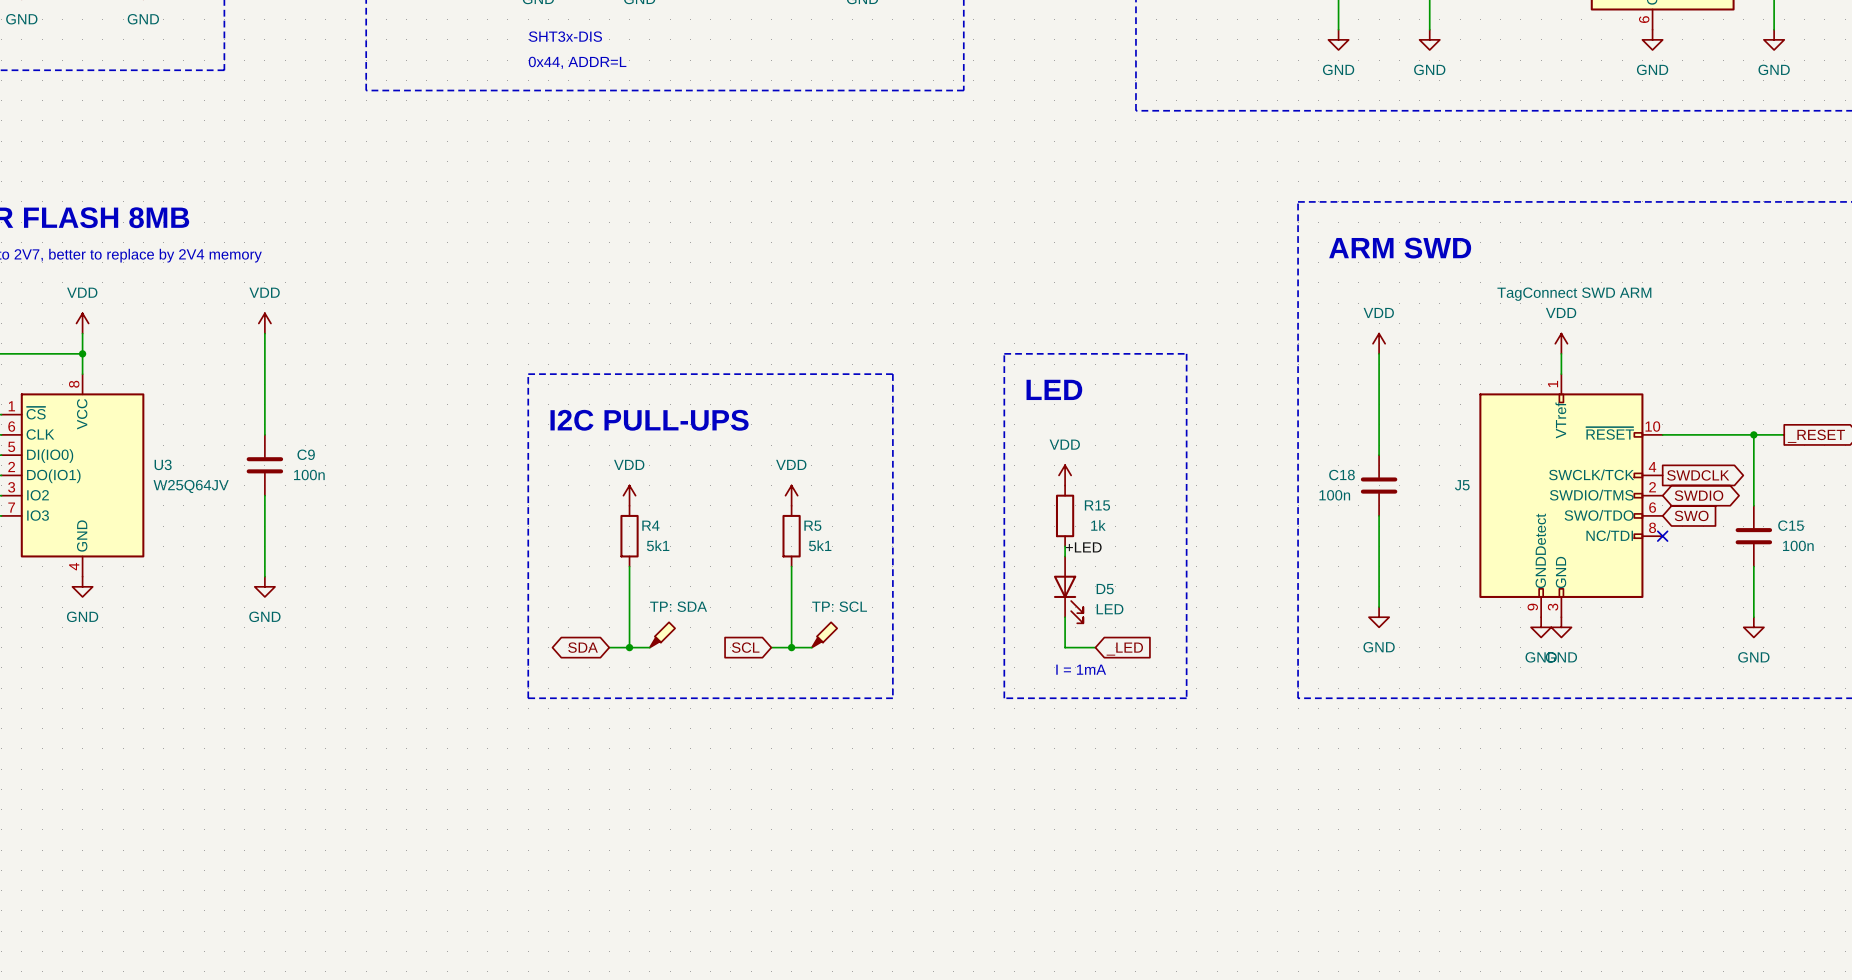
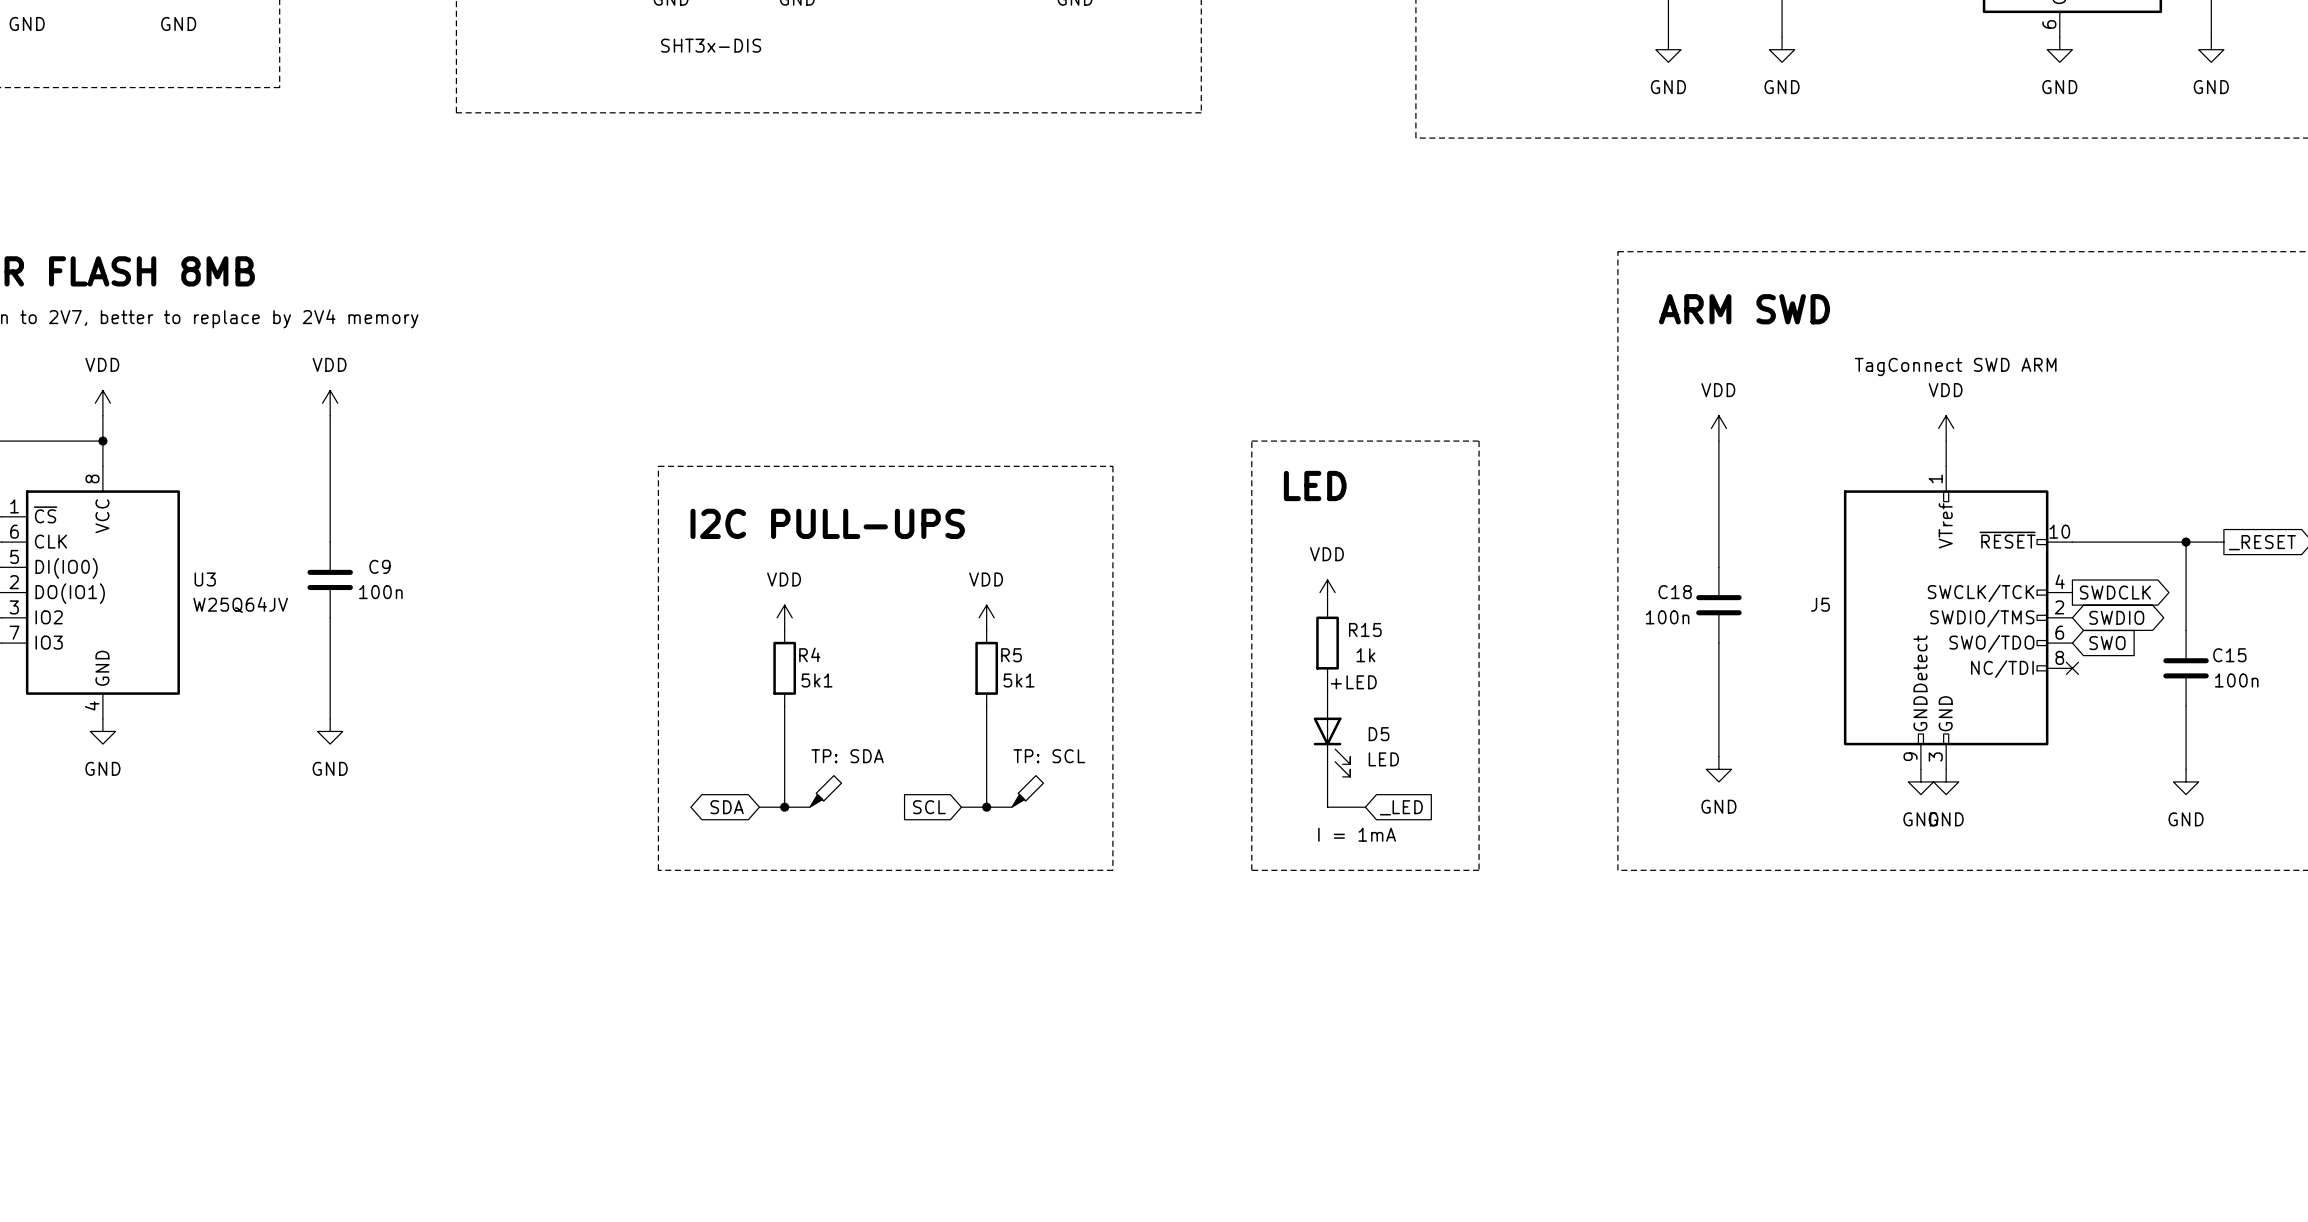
text: 0x44, ADDR=L (577, 62) -> none

